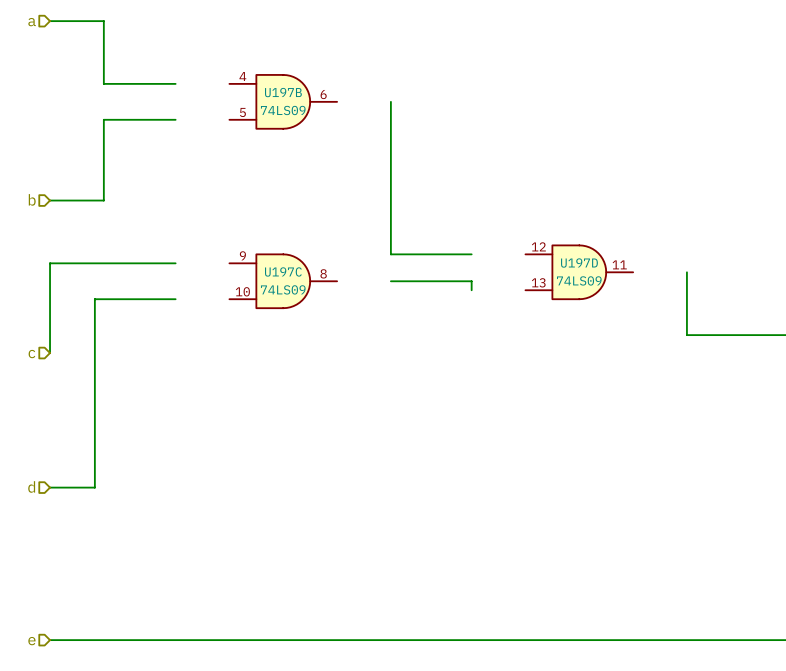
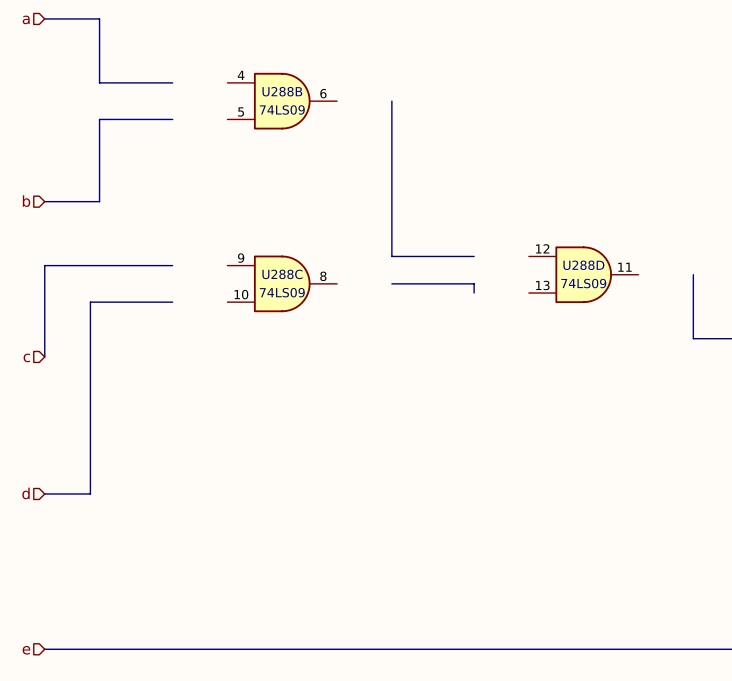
U197B name: U197B (283, 92) -> U288B (282, 91)
U197D name: U197D (579, 262) -> U288D (583, 265)
U197C name: U197C (283, 271) -> U288C (282, 274)

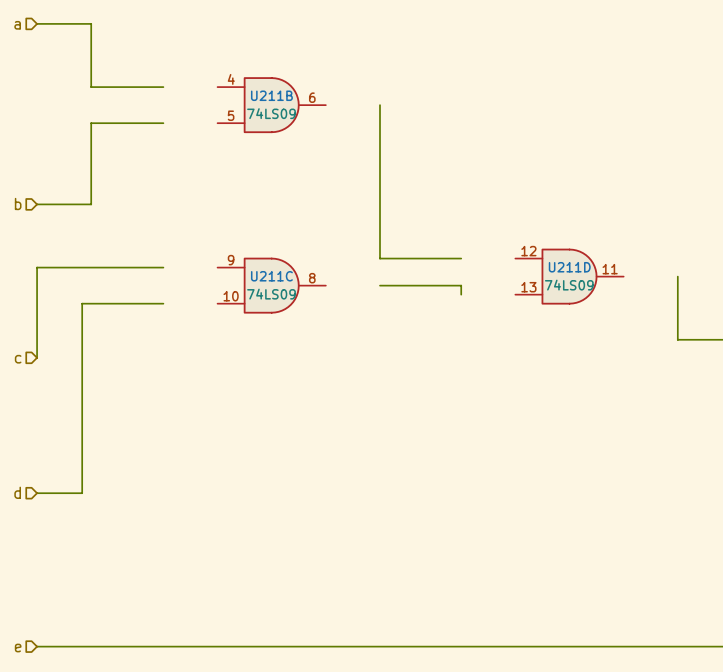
U288B name: U288B (282, 91) -> U211B (271, 95)
U288D name: U288D (583, 265) -> U211D (569, 267)
U288C name: U288C (282, 274) -> U211C (271, 276)

